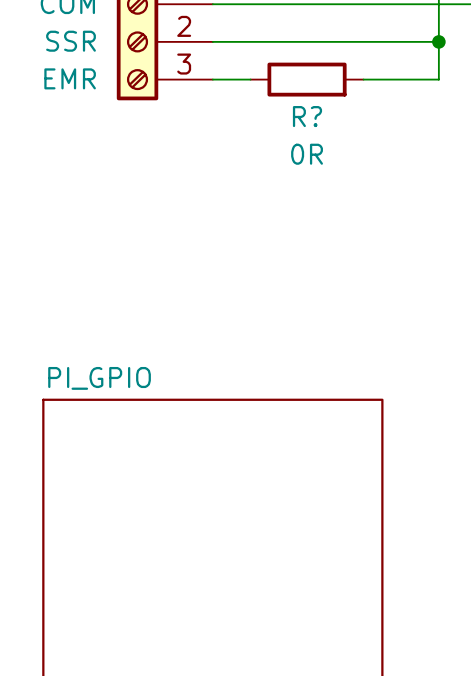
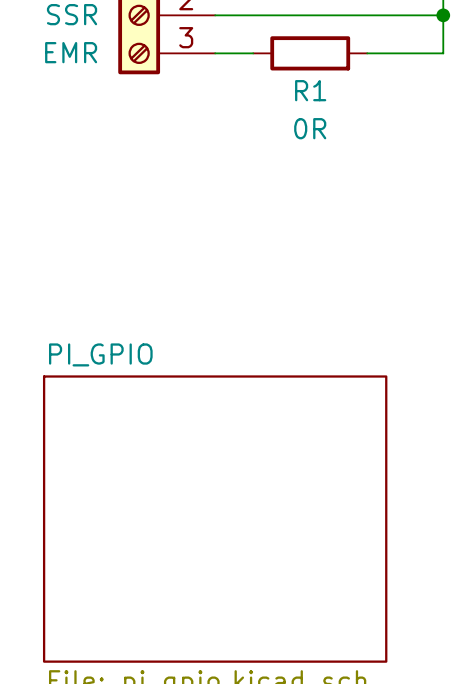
R? name: R? (307, 116) -> R1 (310, 90)

